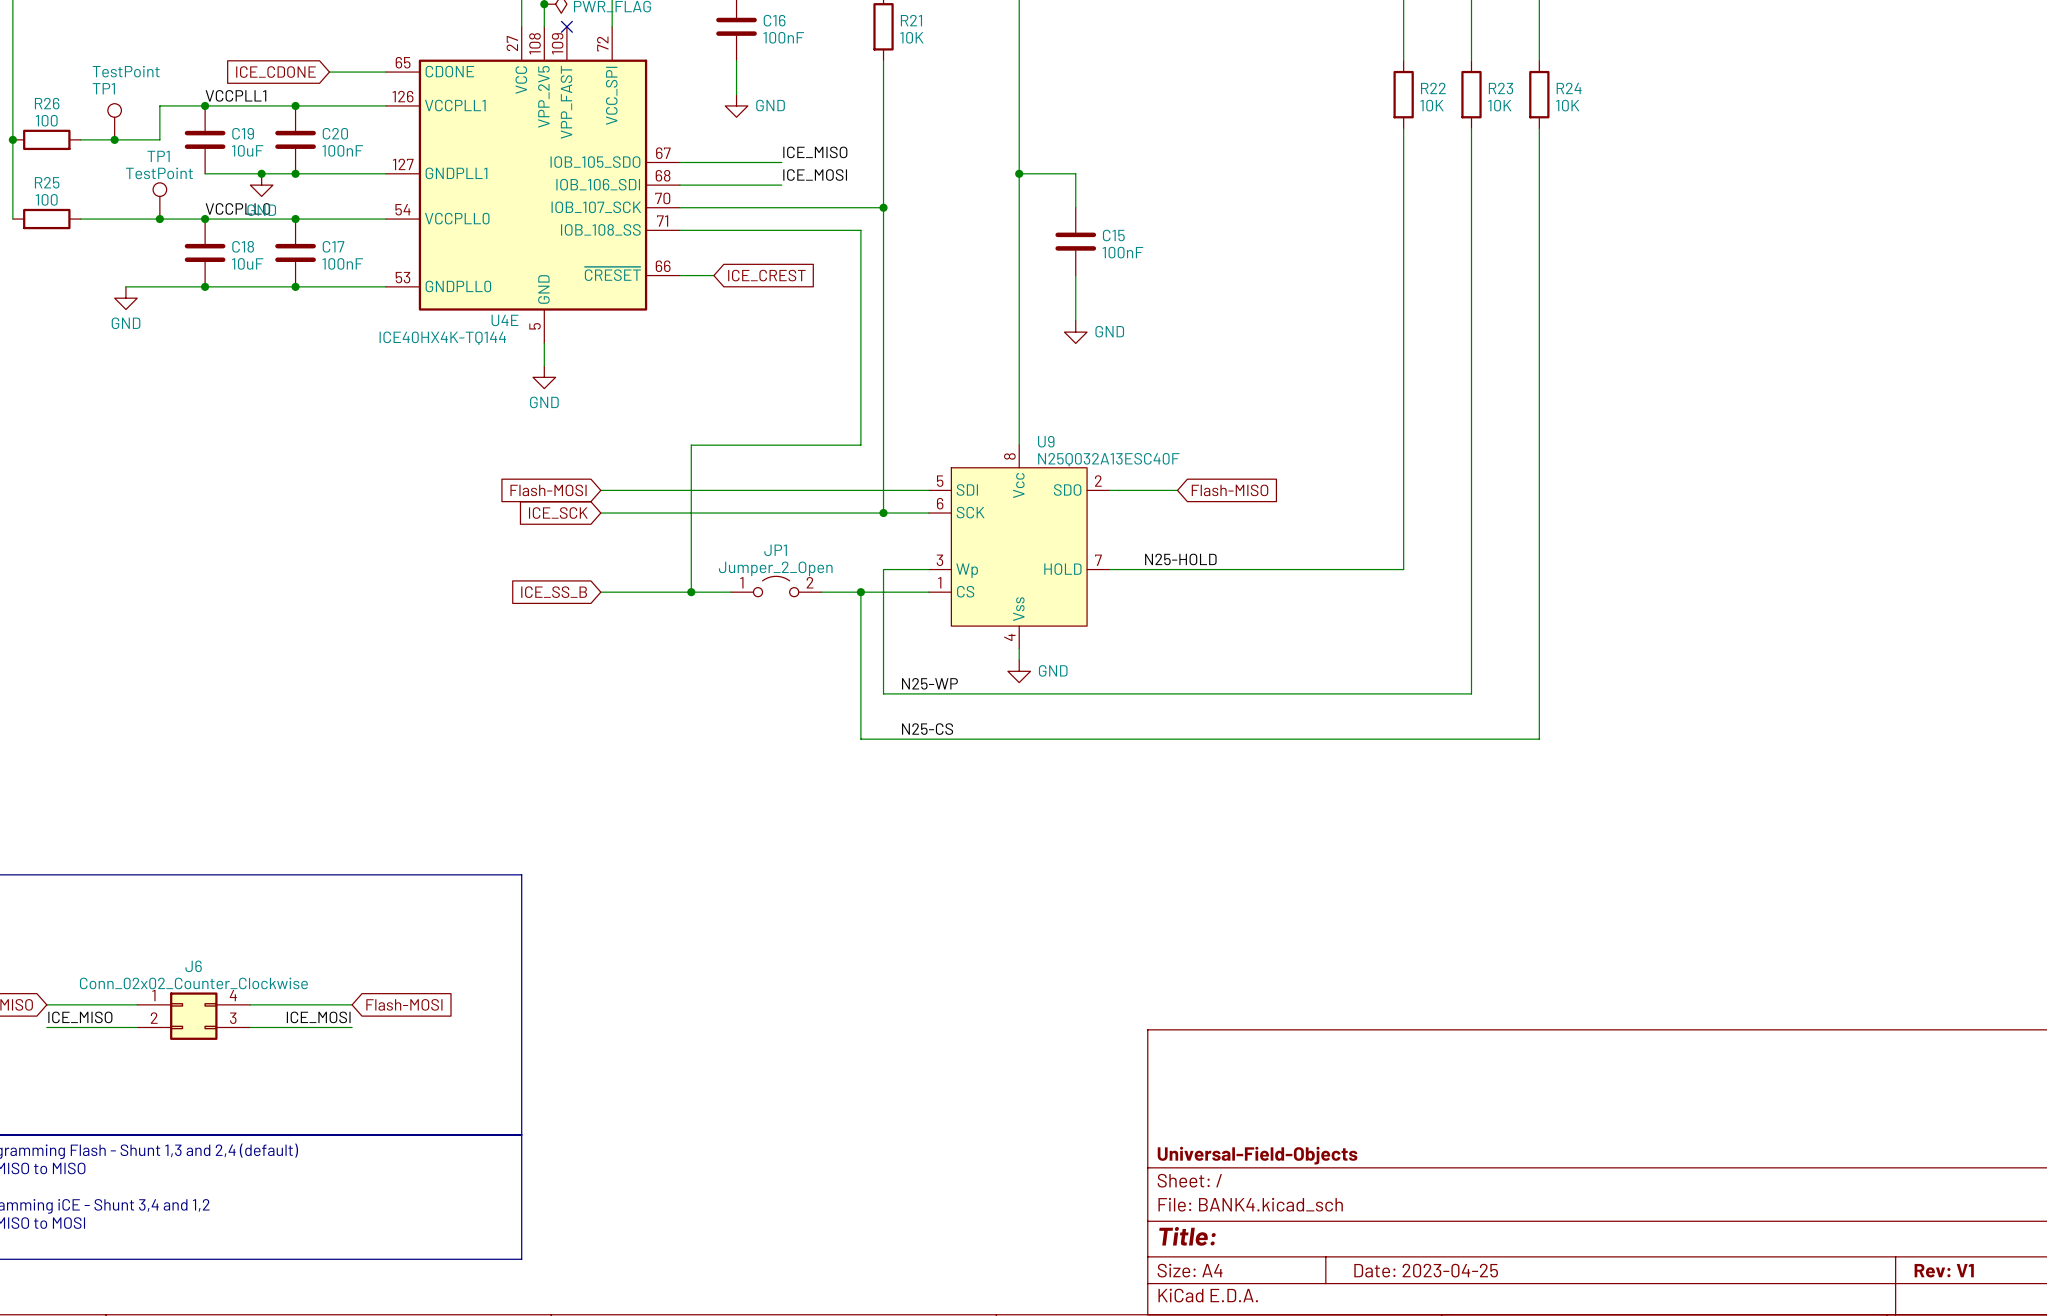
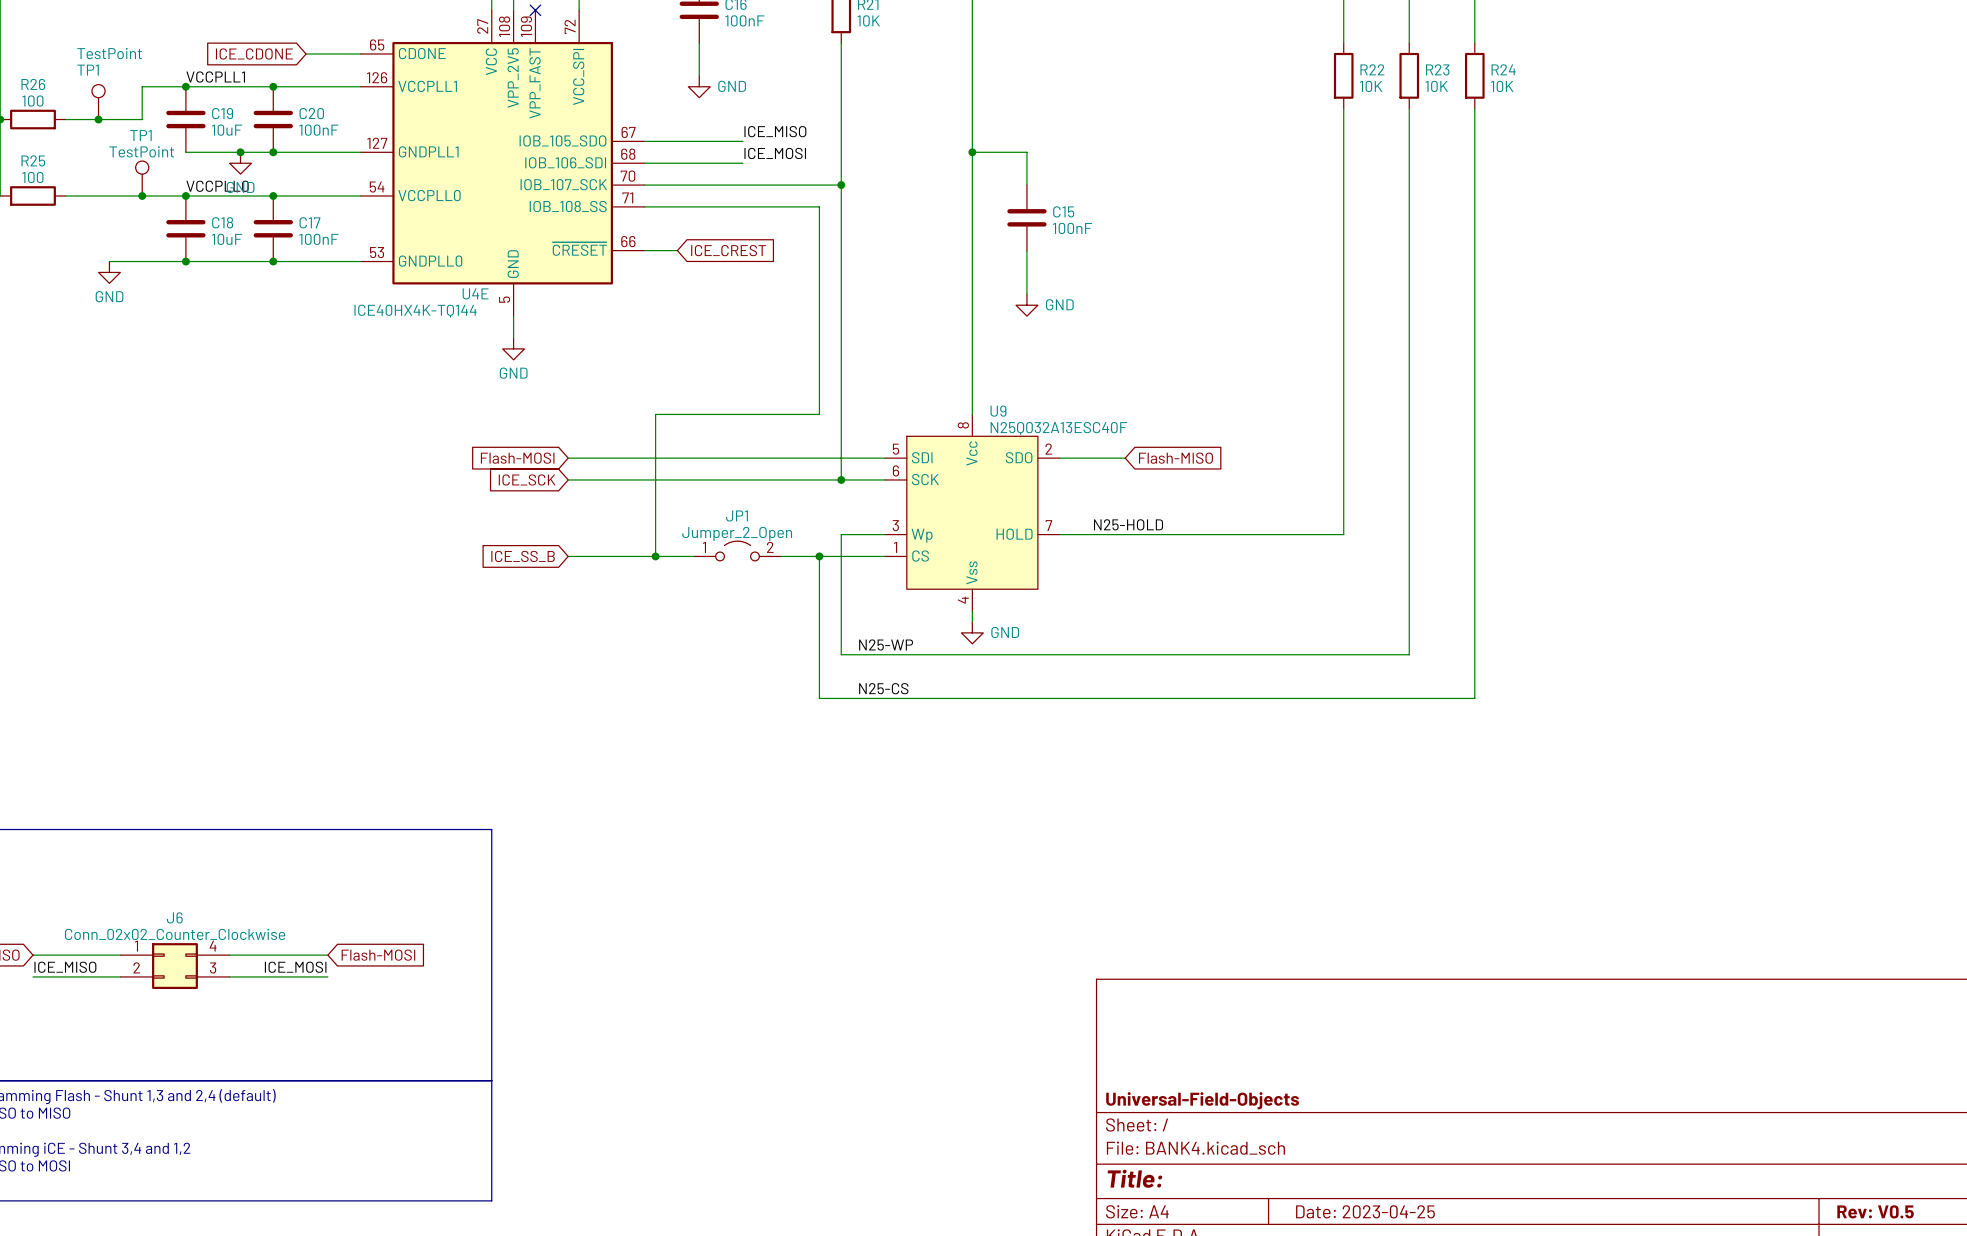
title block: Rev: V1 (1944, 1270) -> Rev: V0.5 (1875, 1211)

